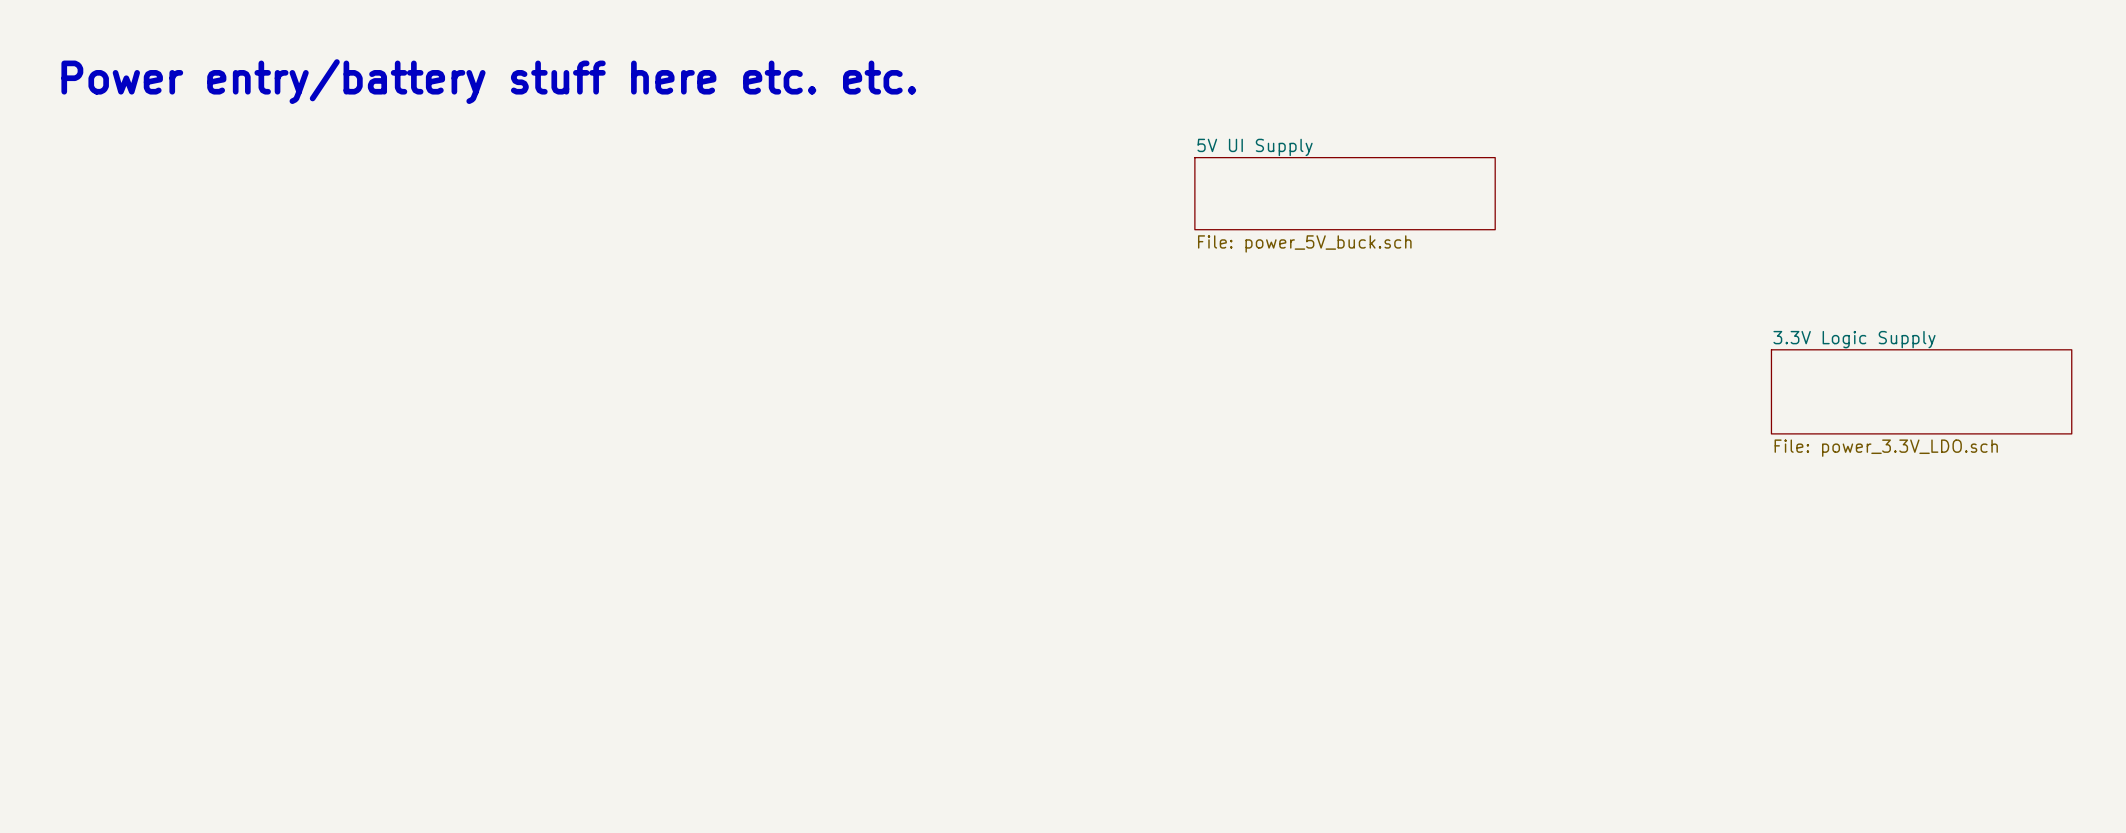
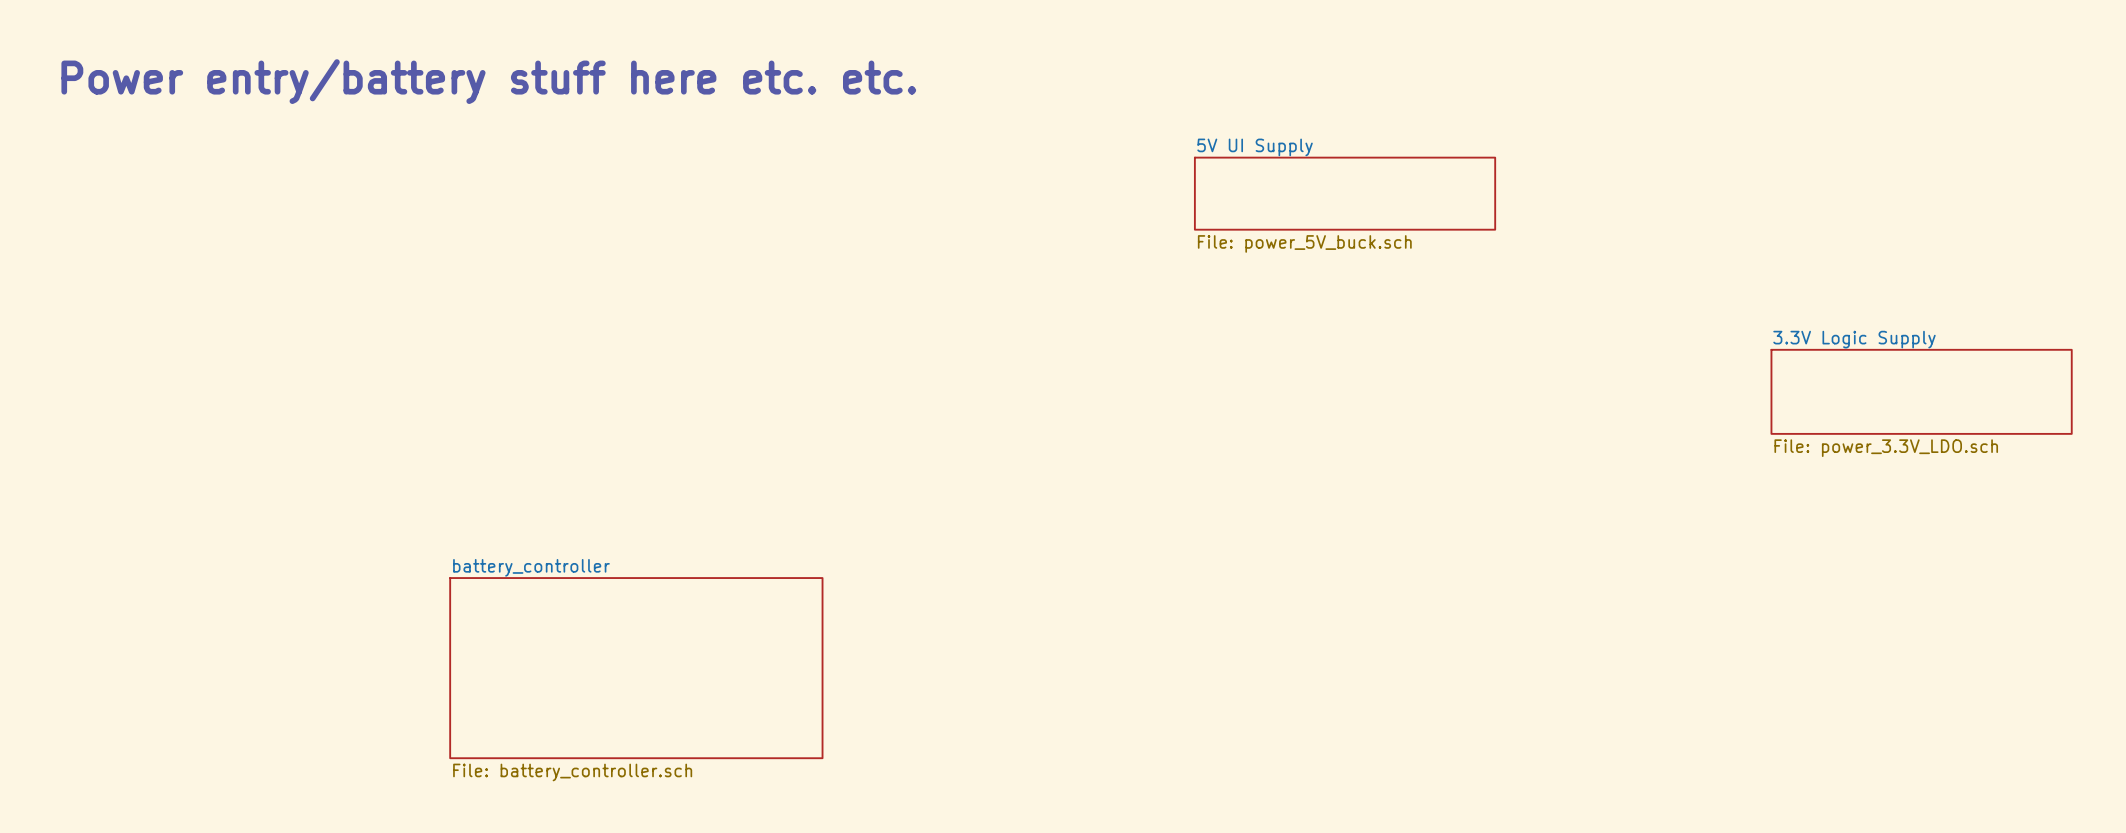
sheet battery_controller: none -> File: battery_controller.sch (636, 668)

